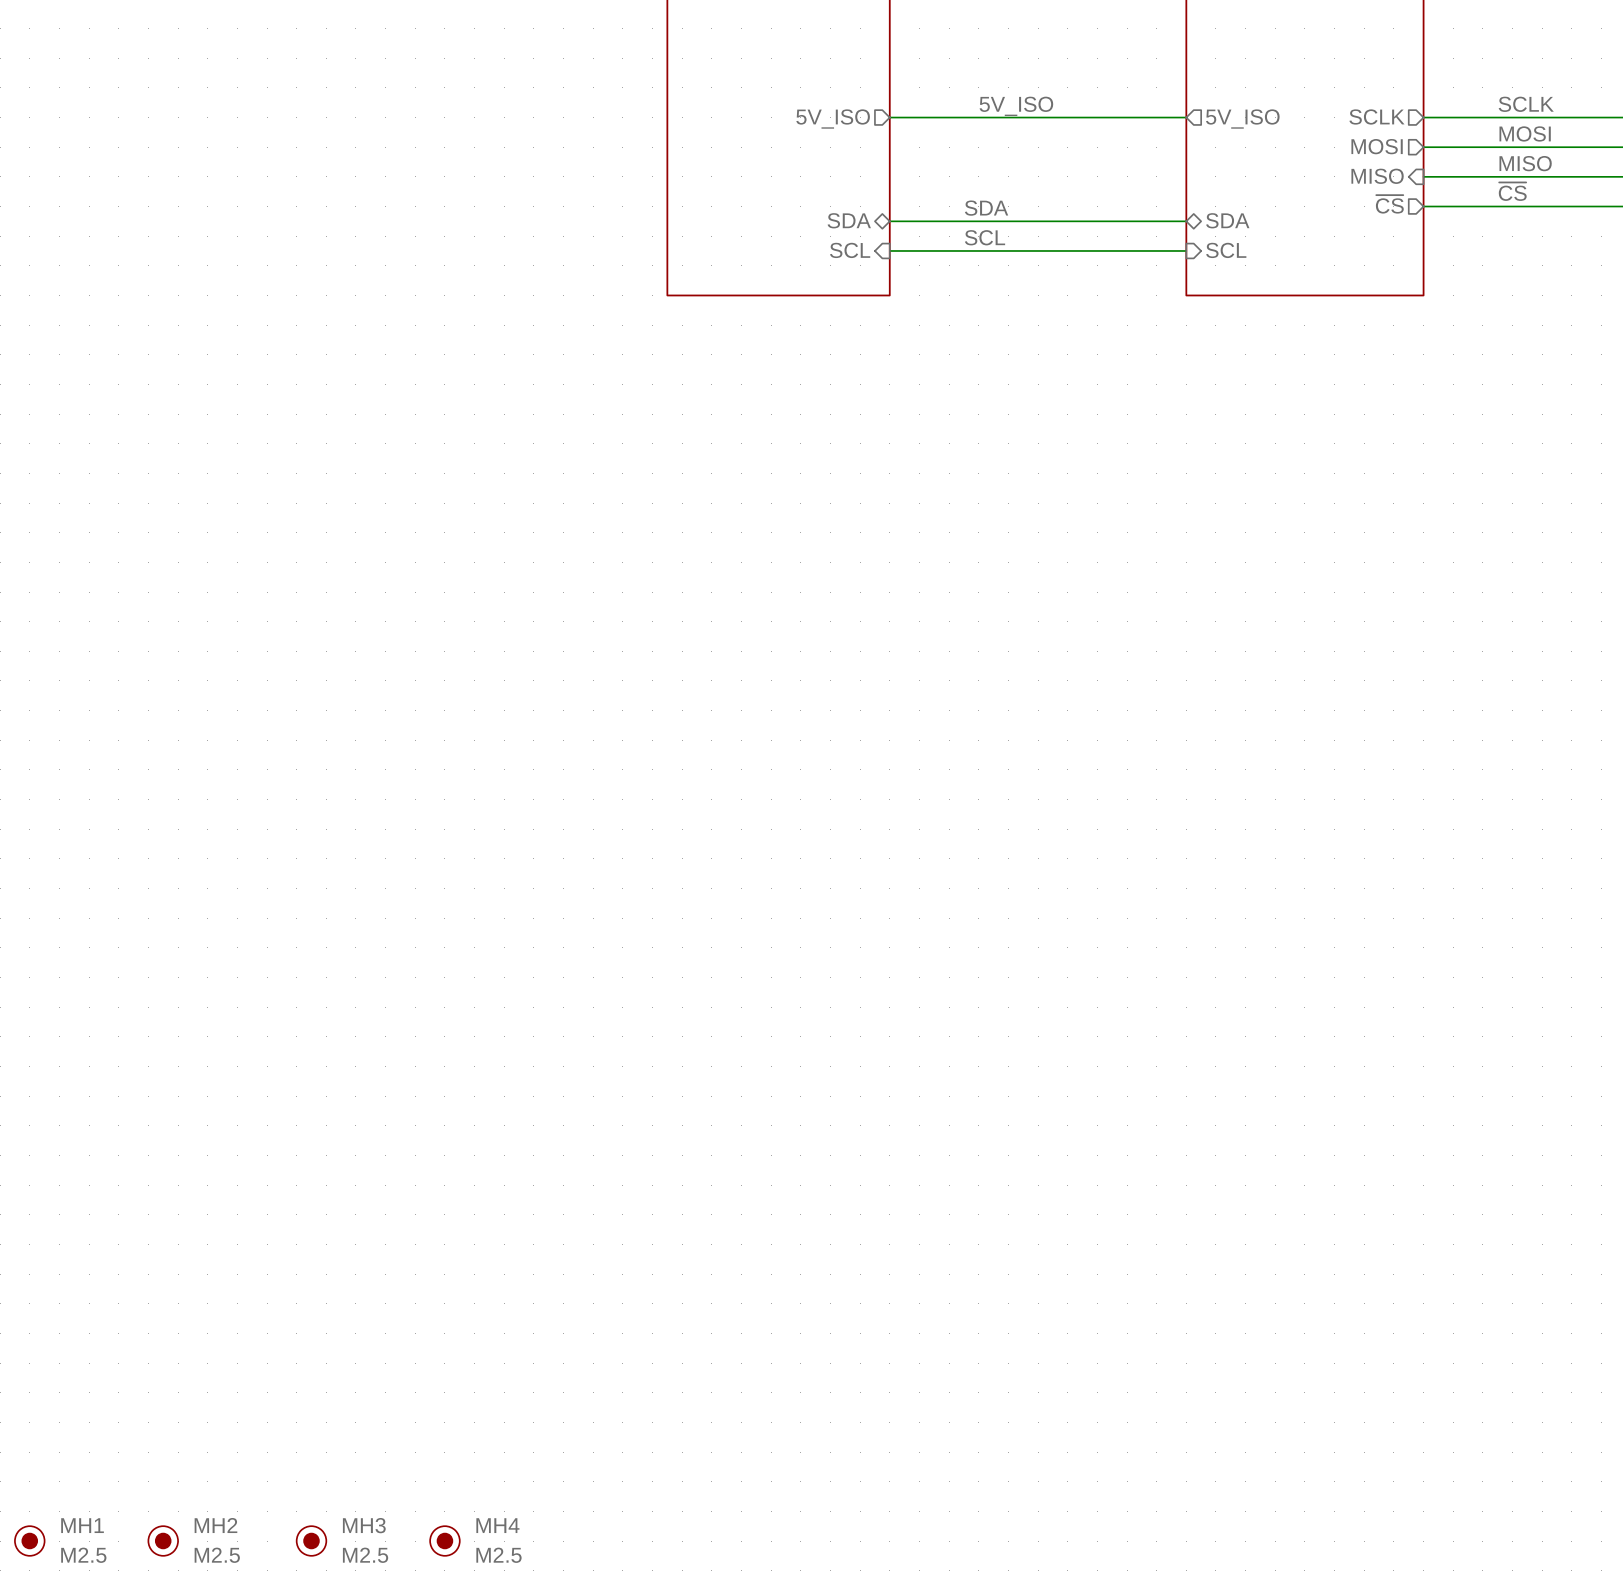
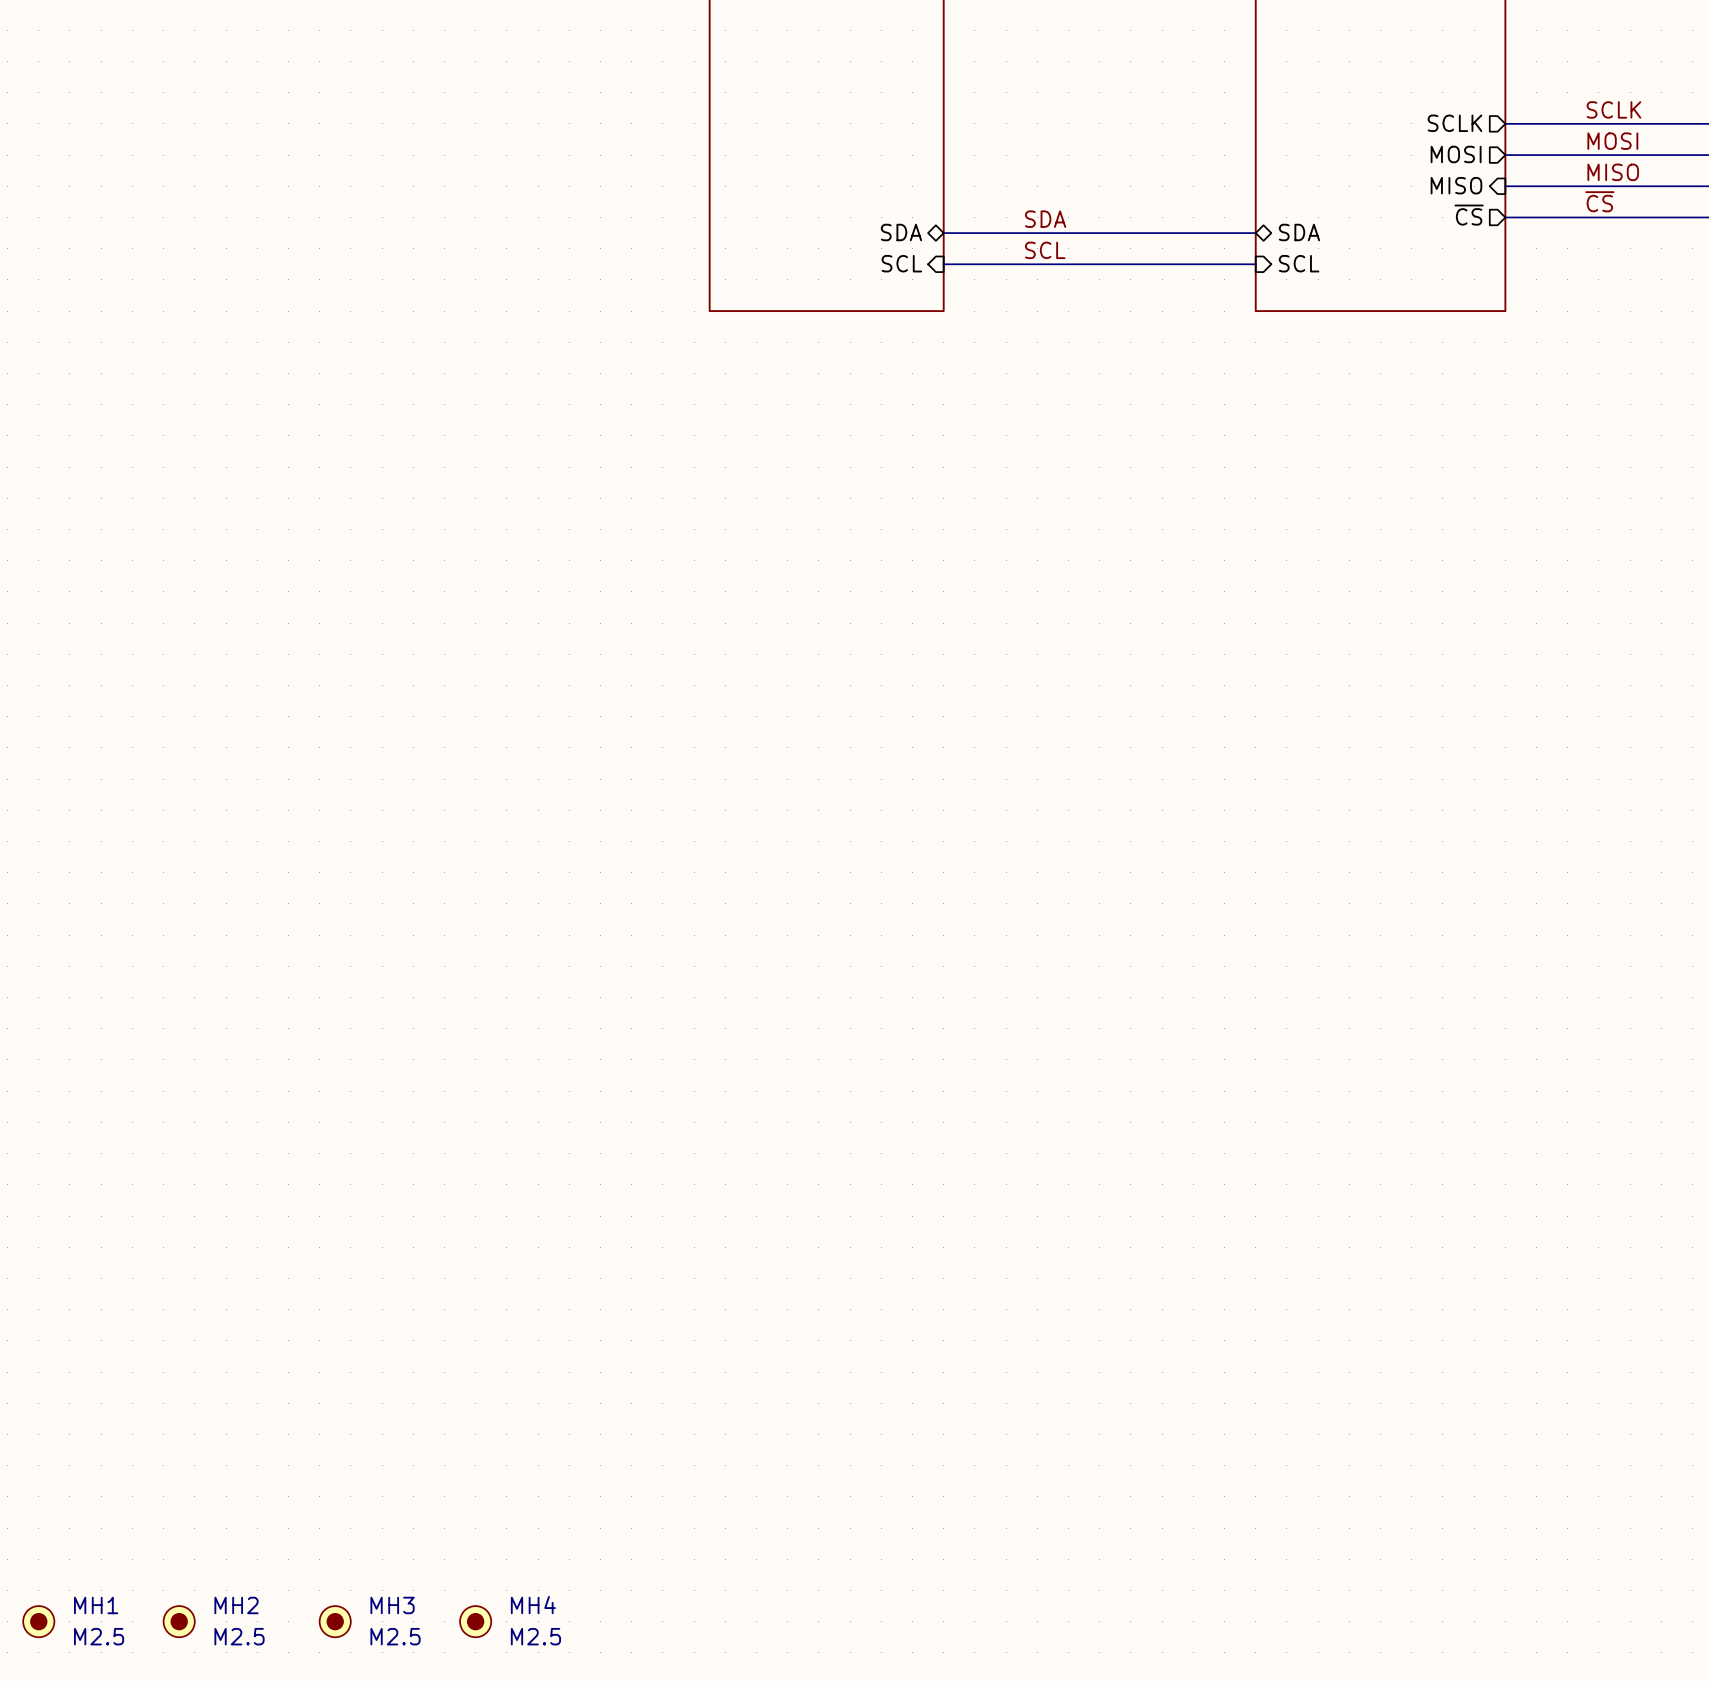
label: 5V_ISO (1016, 106) -> none
wire: (889, 117) (1186, 117) -> none
sheet pin: 5V_ISO (833, 119) -> none
sheet pin: 5V_ISO (1242, 119) -> none

